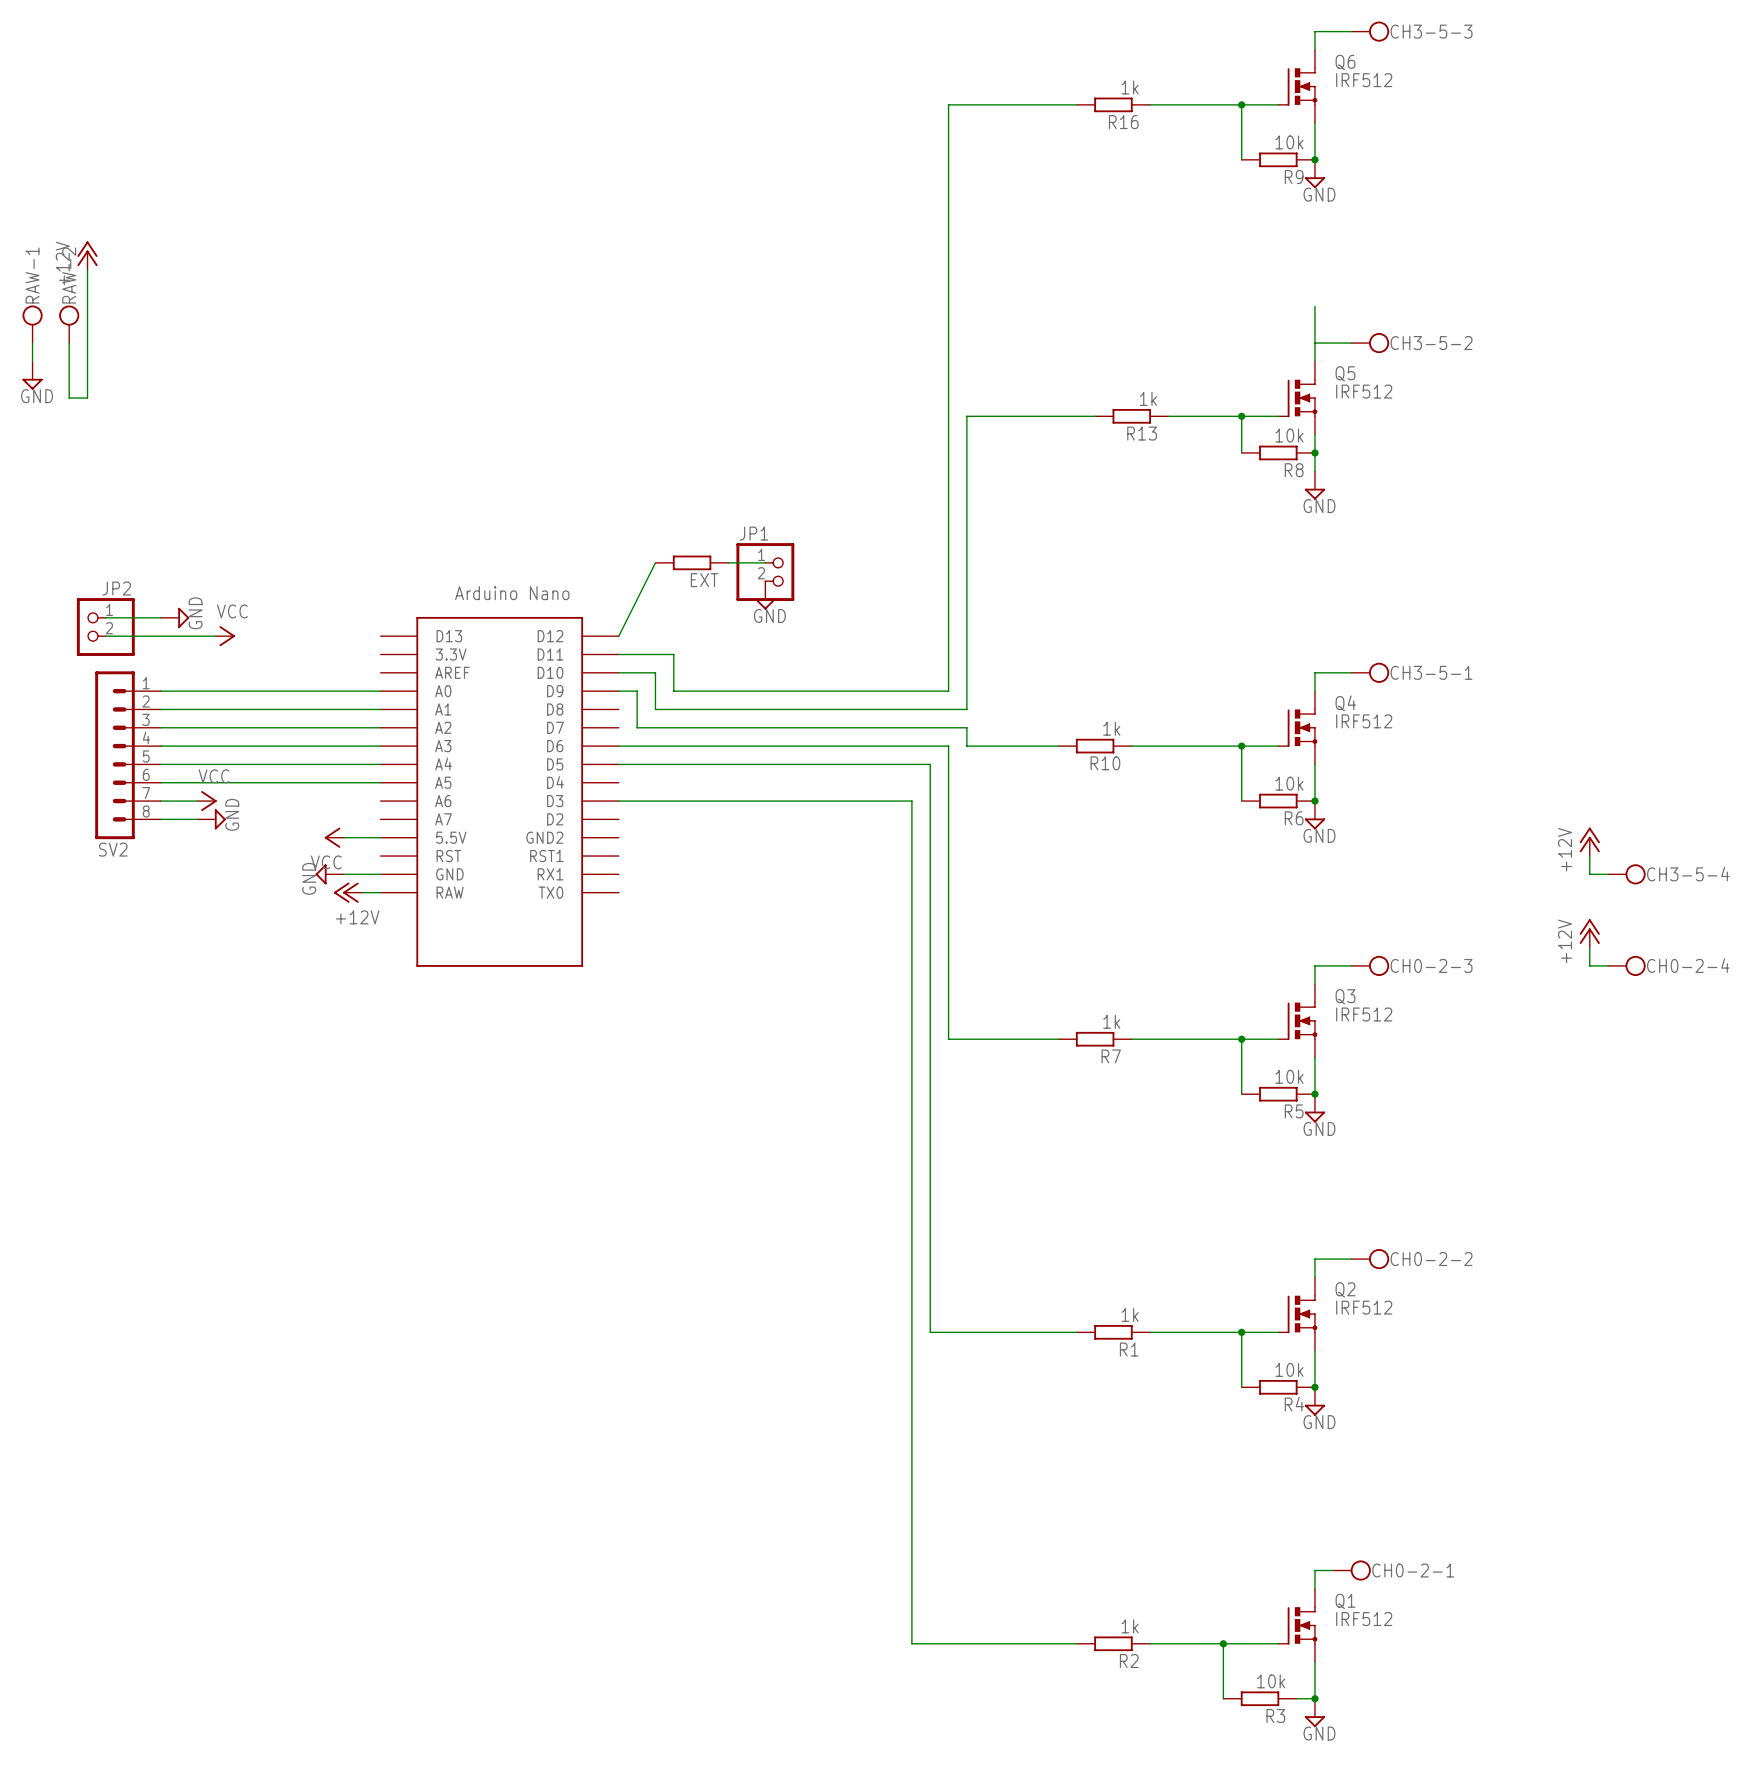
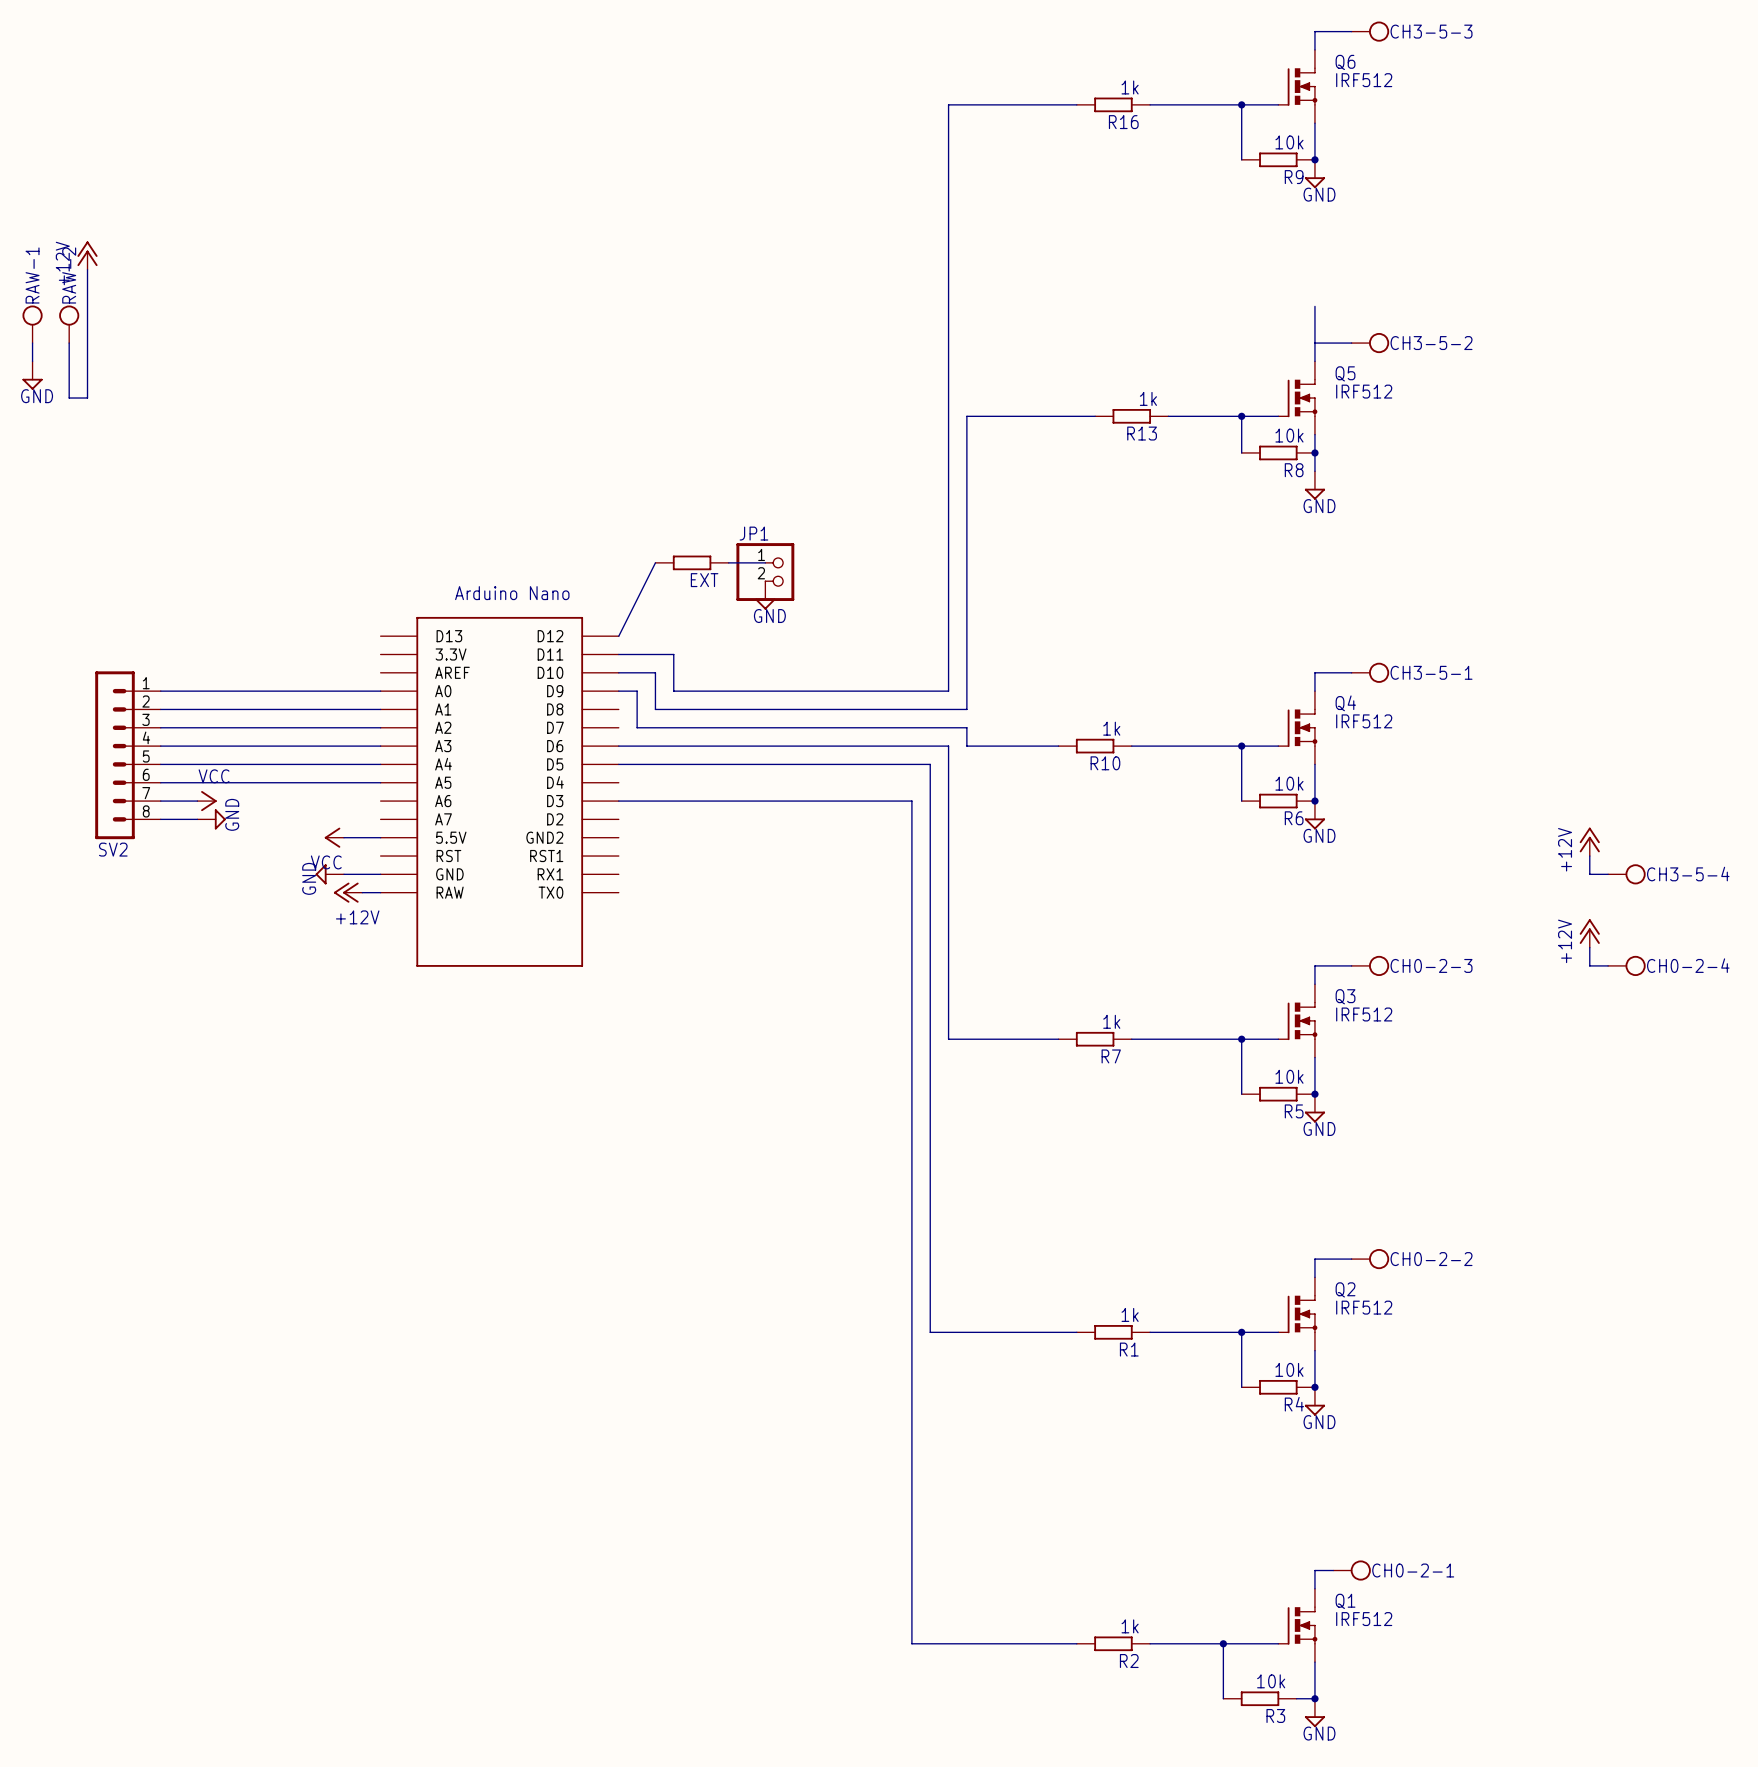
wire: (105, 617) (160, 617) -> none
power symbol: GND (174, 617) -> none
JP2: (105, 627) -> none
wire: (105, 636) (215, 636) -> none
power symbol: VCC (225, 636) -> none

